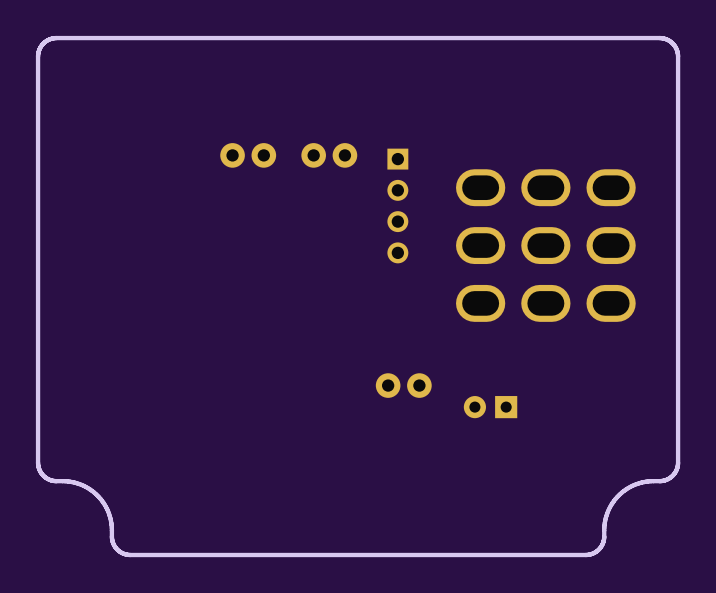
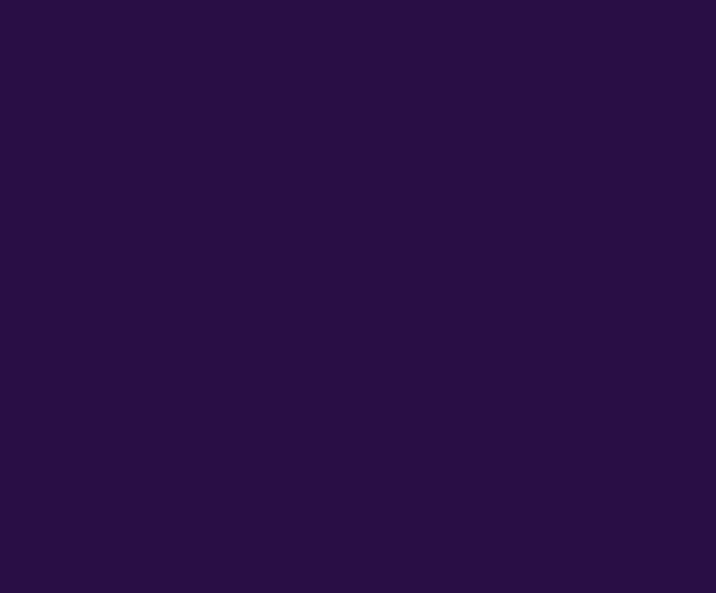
board edge: (659, 38) (672, 42) (678, 55) (677, 464) (674, 472) (668, 478) (636, 484) (616, 497) (607, 513) (603, 541) (596, 551) (585, 554) (127, 554) (119, 551) (114, 545) (109, 513) (95, 493) (79, 484) (52, 480) (41, 473) (38, 462) (38, 56) (40, 47) (45, 41) (56, 38) (659, 38) -> none
part: (248, 155) -> none
part: (329, 155) -> none
part: (397, 205) -> none
part: (545, 245) -> none
part: (403, 385) -> none
part: (490, 407) -> none

